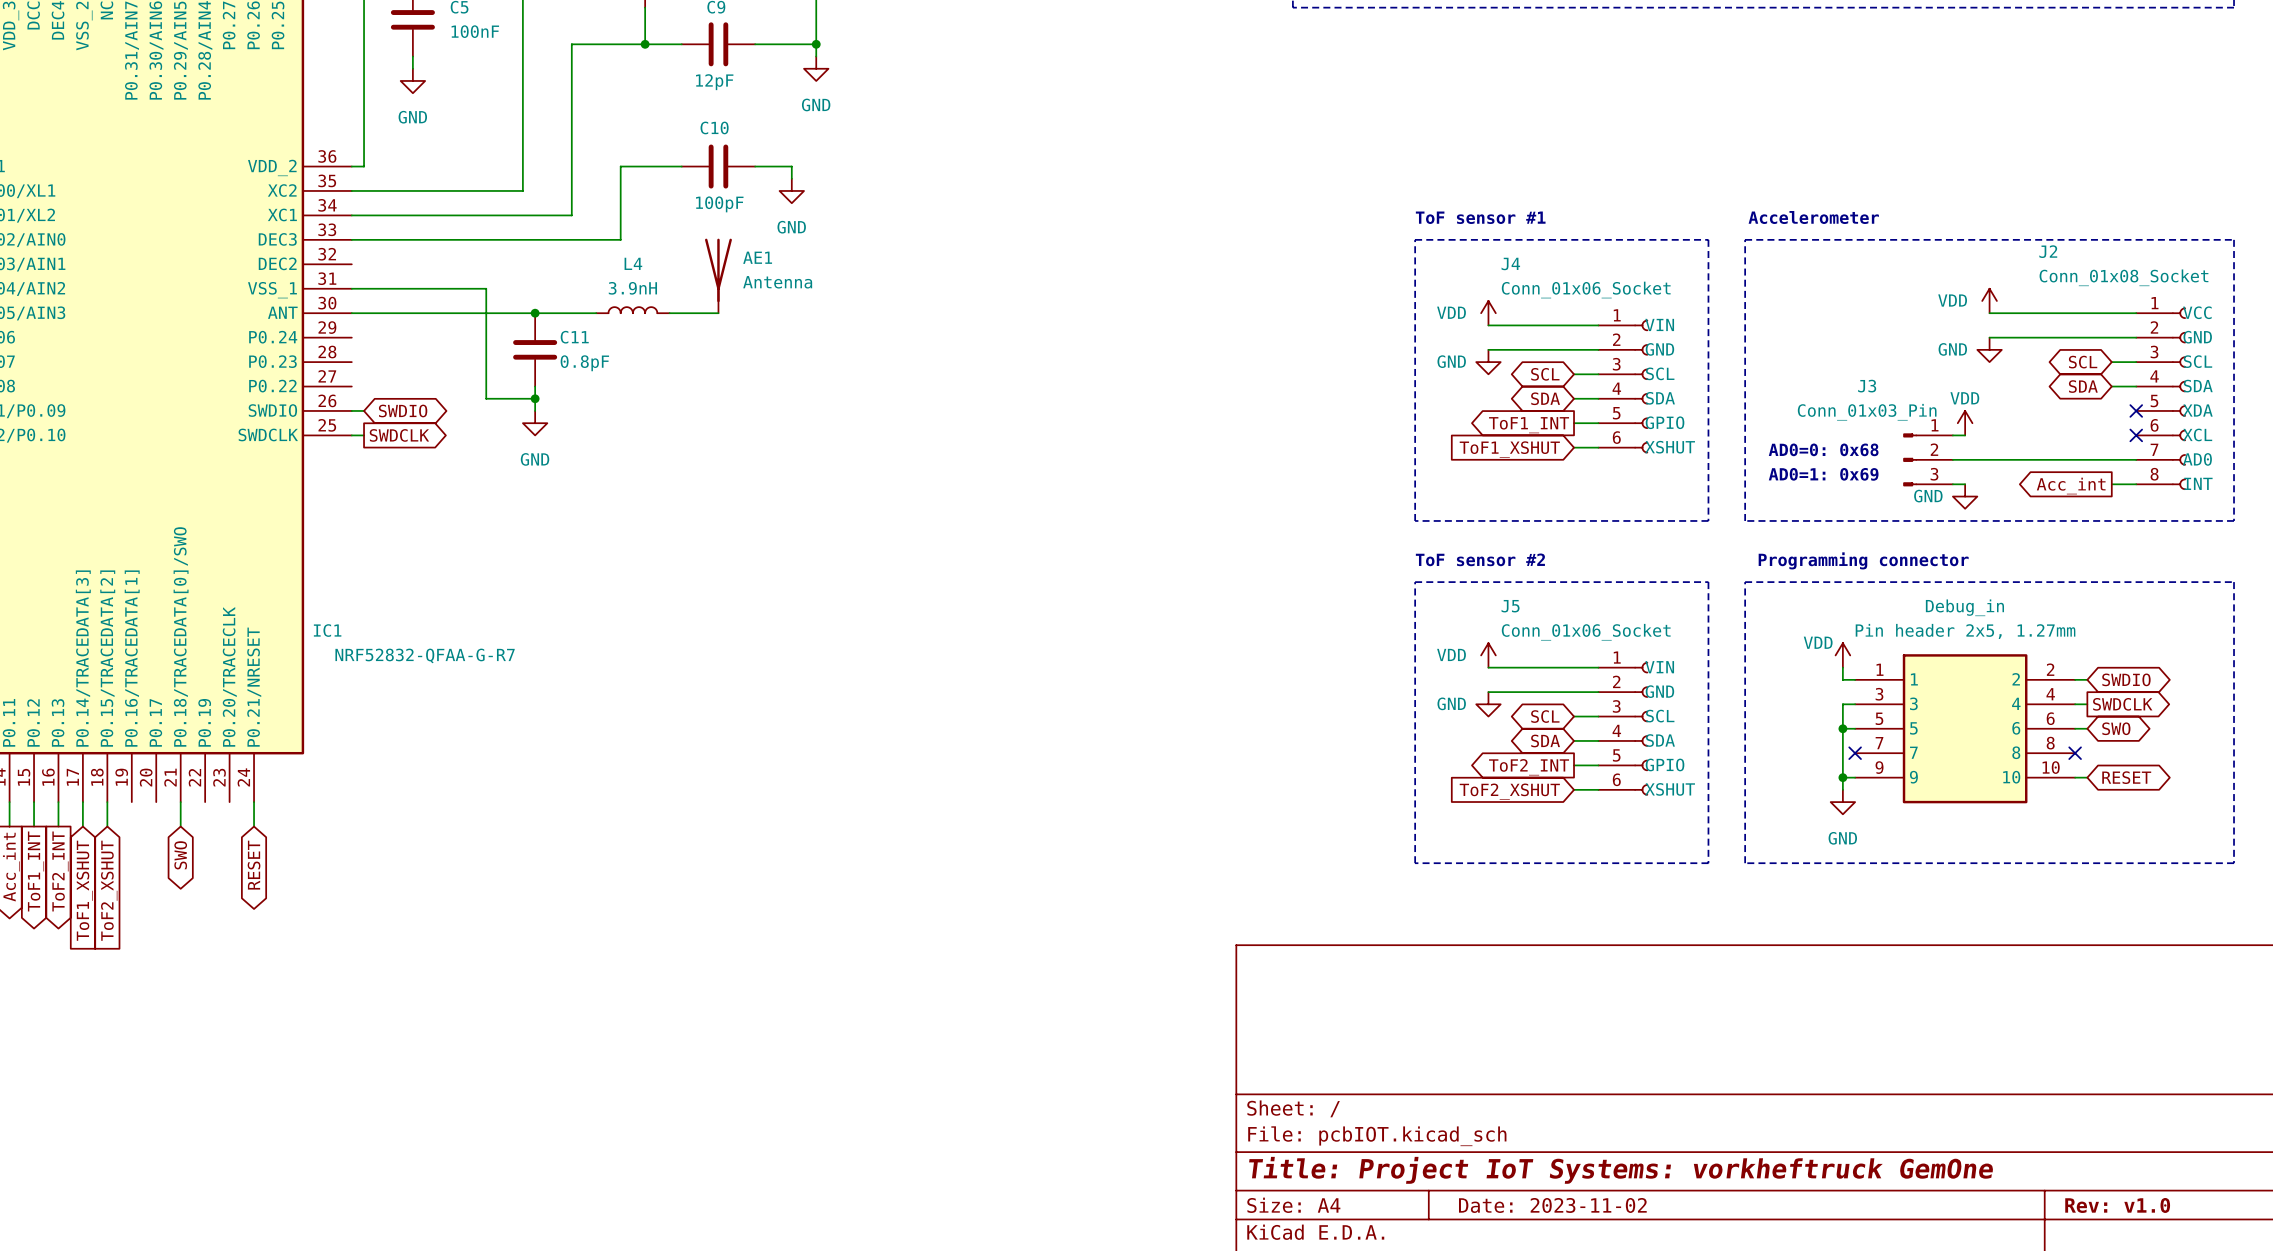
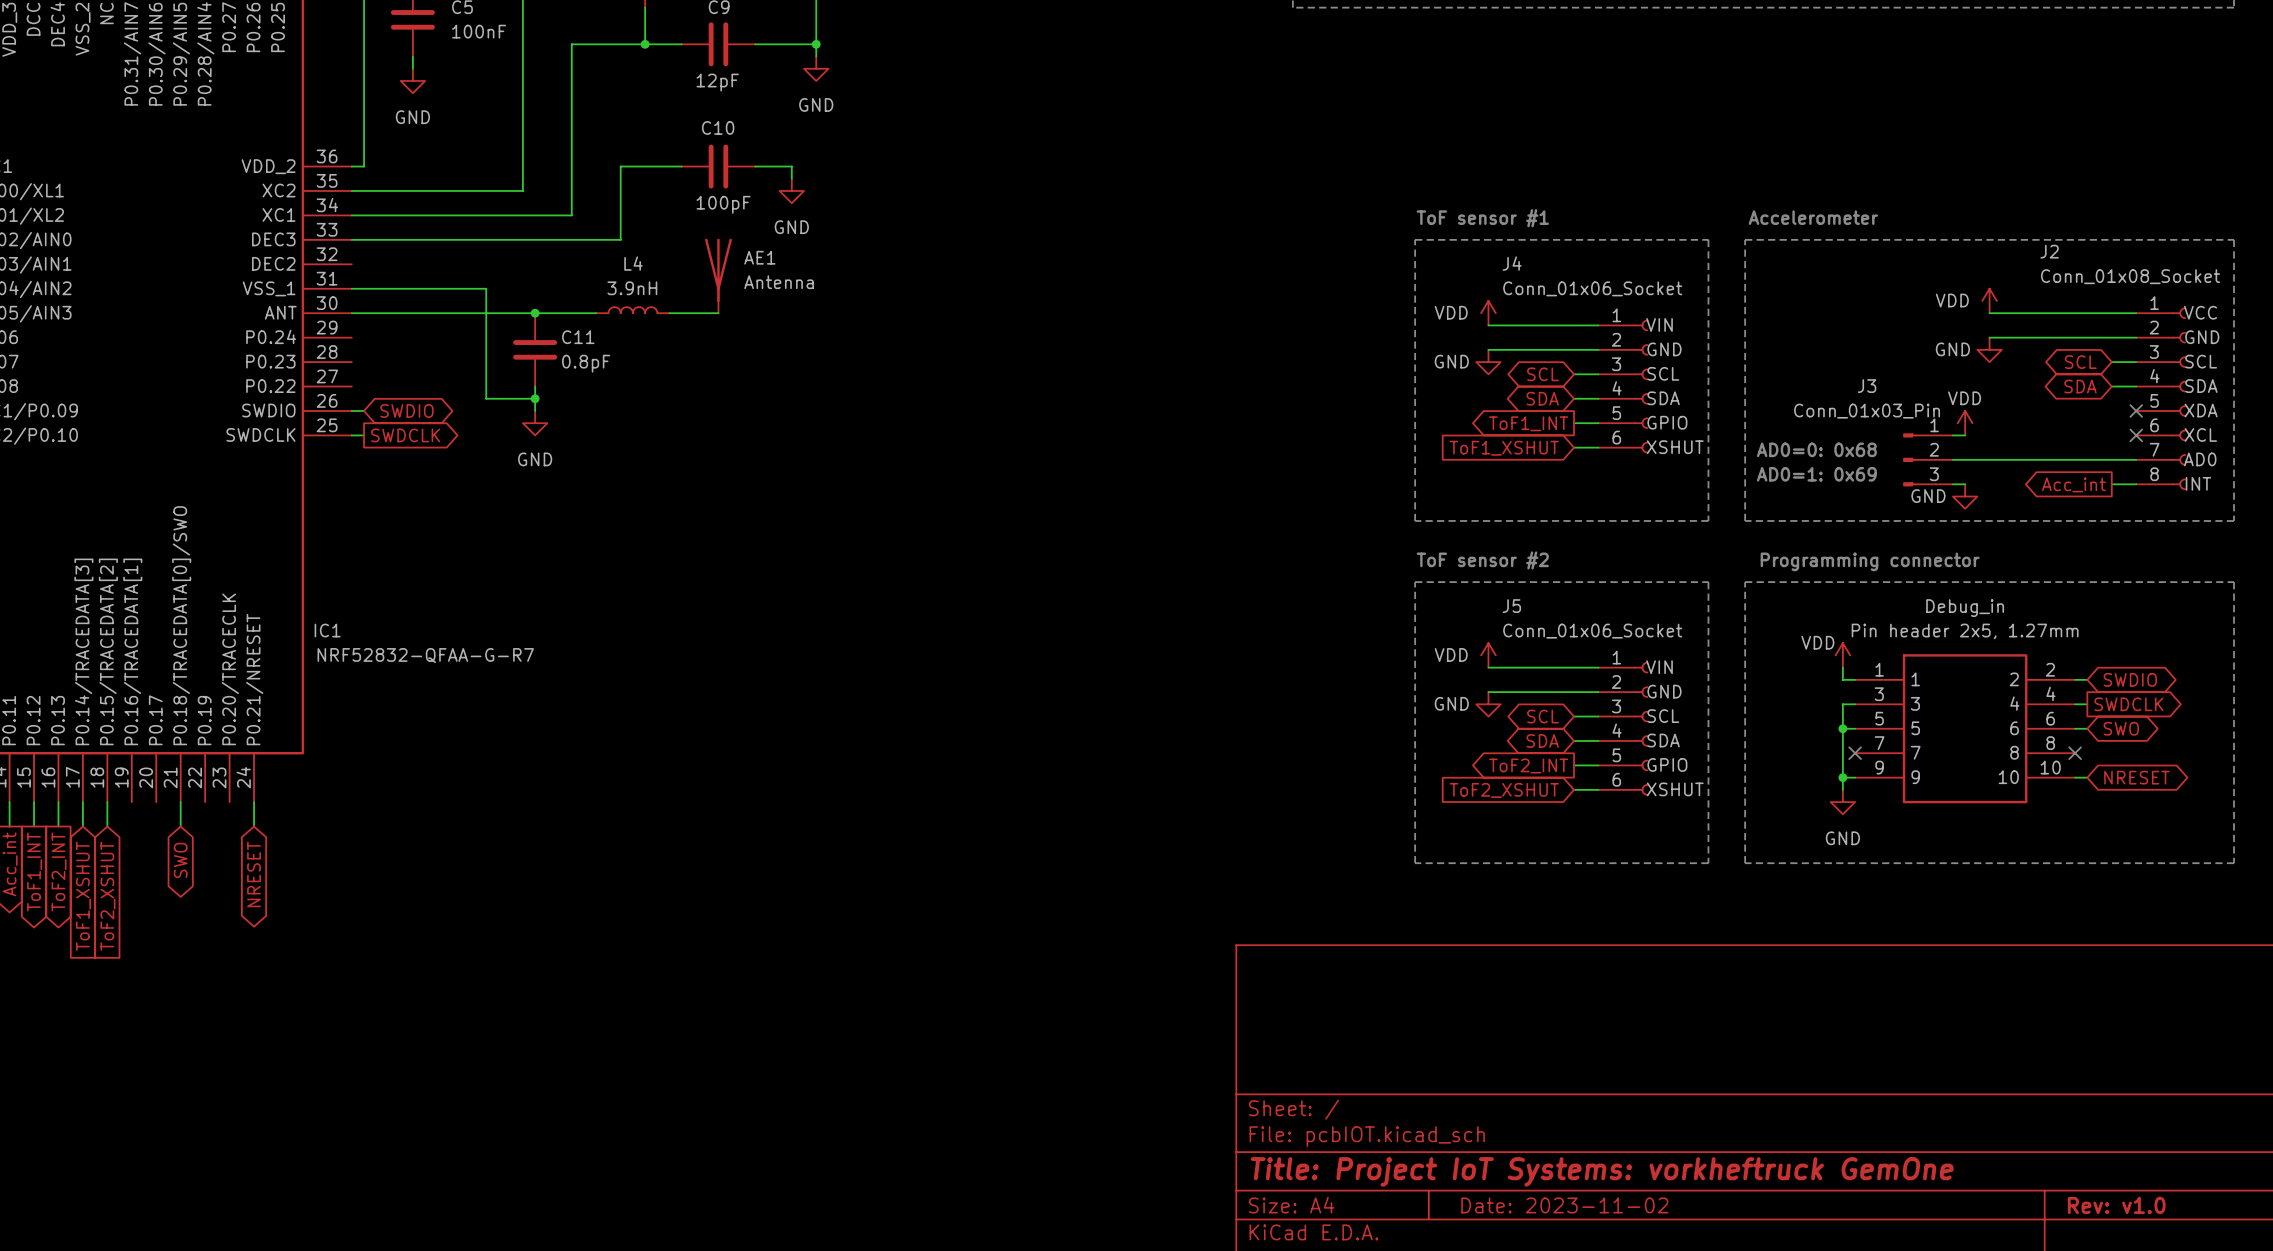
global label: RESET (2126, 777) -> NRESET (2136, 777)
global label: RESET (254, 865) -> NRESET (254, 874)

